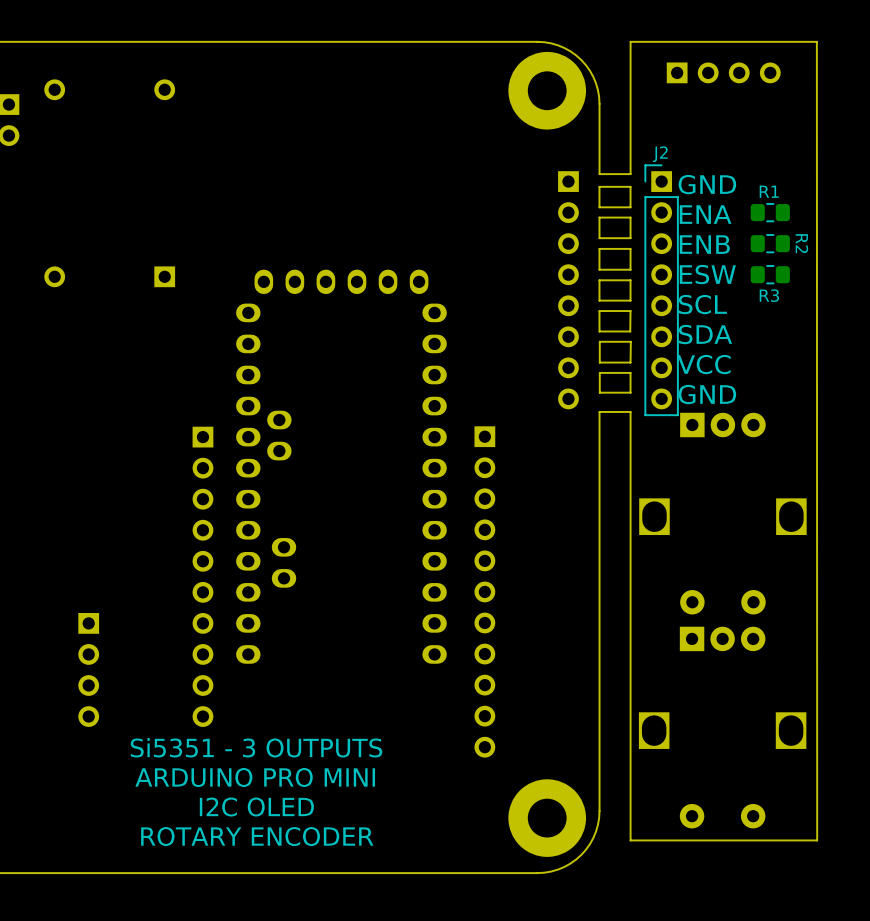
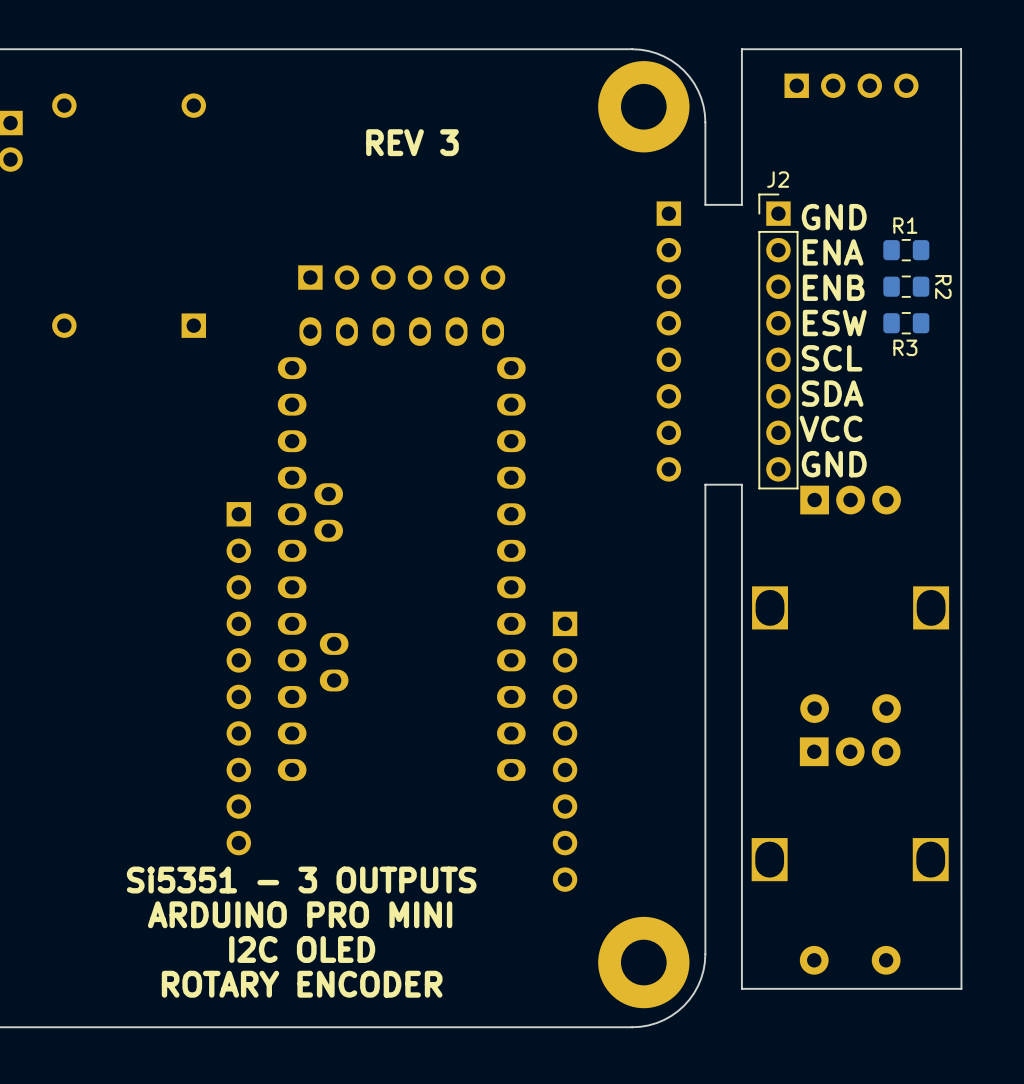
text: none -> REV 3 (412, 142)
board edge: (630, 186) (630, 207) (599, 207) (599, 186) (630, 186) -> none
board edge: (630, 217) (630, 238) (599, 238) (599, 217) (630, 217) -> none
part: none -> (401, 277)
board edge: (630, 248) (630, 269) (599, 269) (599, 248) (630, 248) -> none
board edge: (630, 280) (630, 300) (599, 300) (599, 280) (630, 280) -> none
board edge: (630, 311) (630, 331) (599, 331) (599, 311) (630, 311) -> none
board edge: (630, 341) (630, 362) (599, 362) (599, 341) (630, 341) -> none
board edge: (630, 372) (630, 392) (599, 392) (599, 372) (630, 372) -> none
part: (484, 591) -> none
part: none -> (565, 751)
part: (88, 669) -> none

